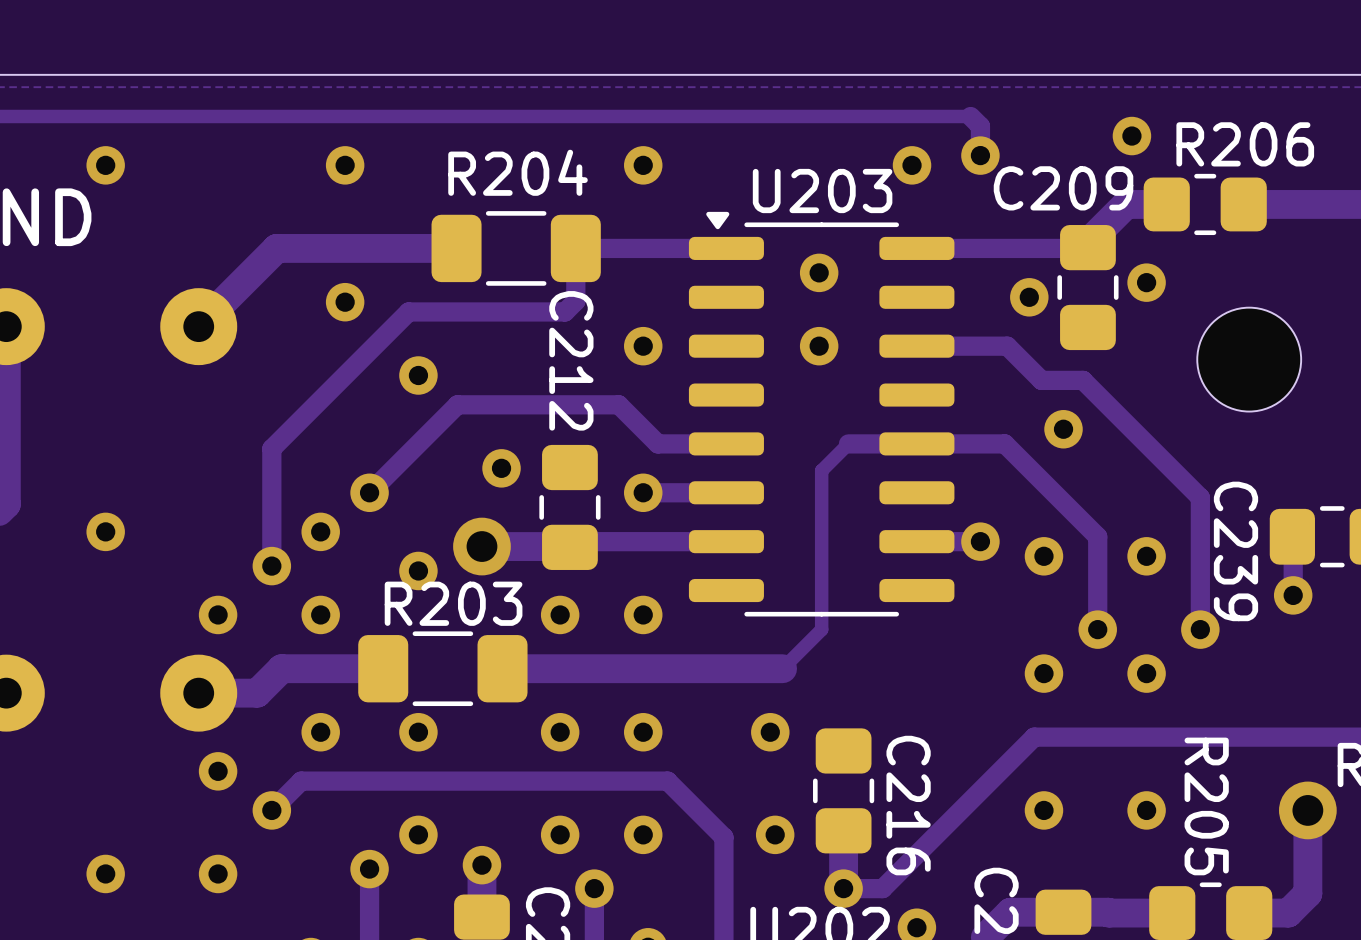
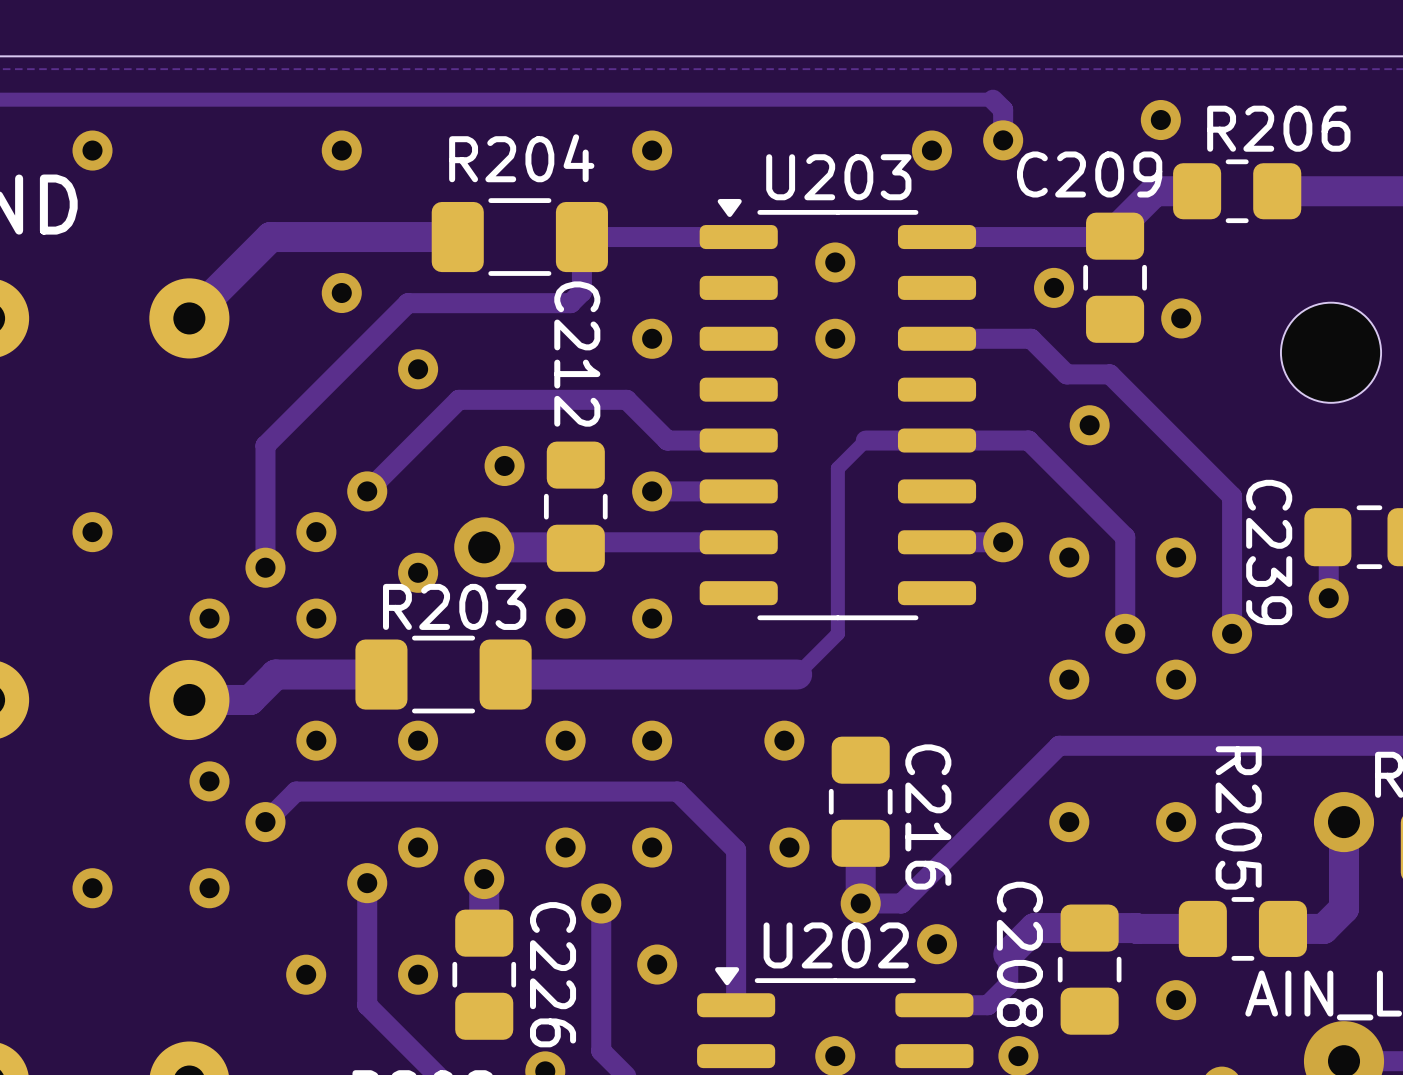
via position: (1146, 282) -> (1181, 318)
part: (1249, 359) -> none
part: none -> (1331, 352)

